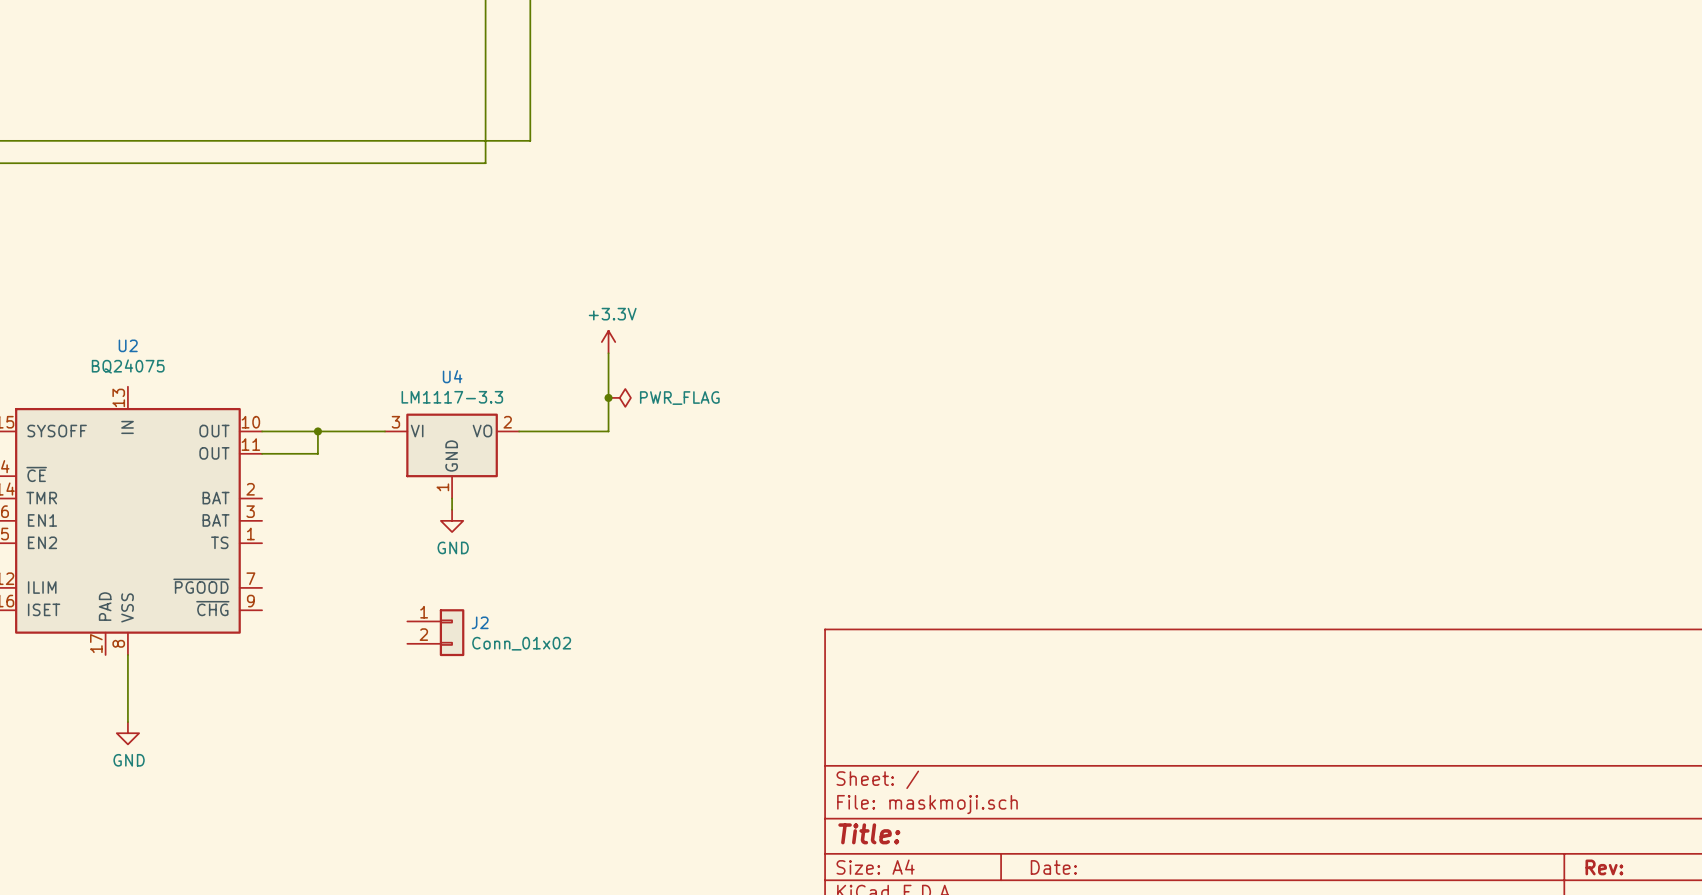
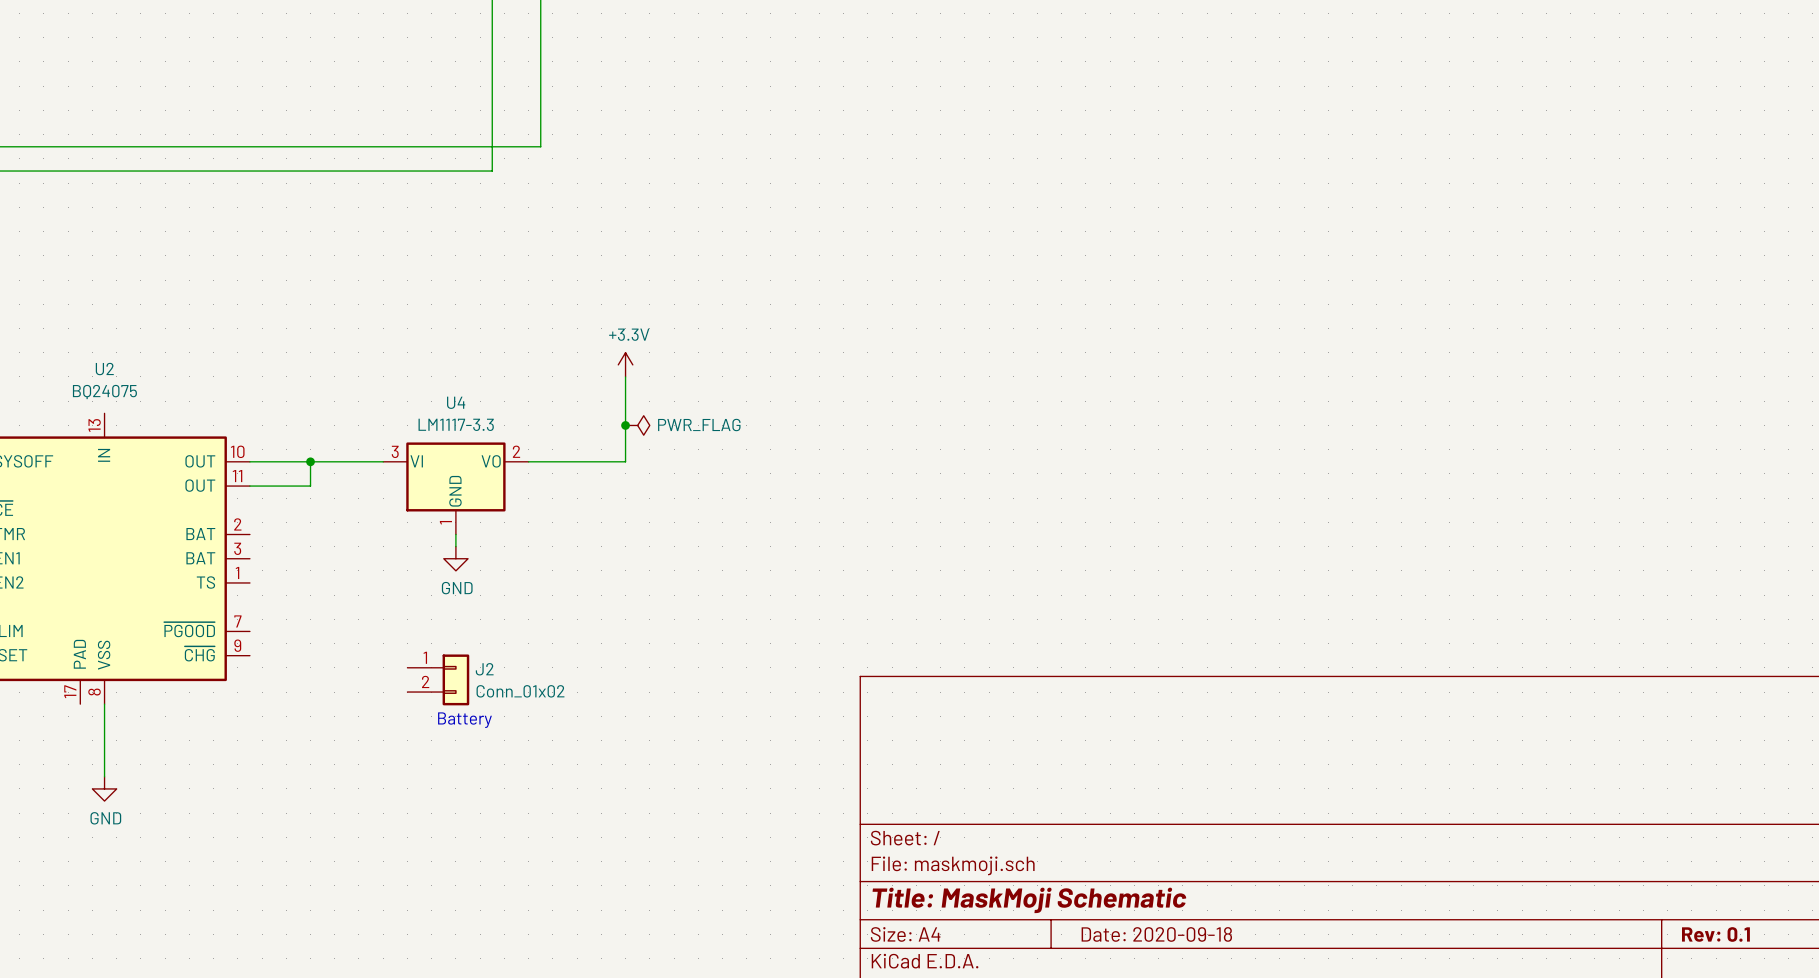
text: none -> Battery (464, 720)
title block: Title: (869, 833) -> Title: MaskMoji Schematic (1029, 900)
title block: Date: (1053, 867) -> Date: 2020-09-18 (1156, 934)
title block: Rev: (1604, 867) -> Rev: 0.1 (1715, 934)

